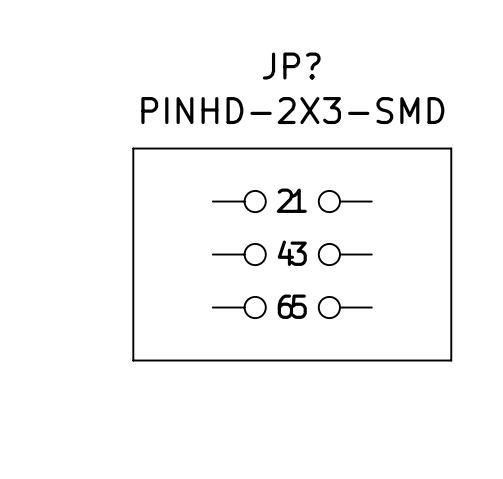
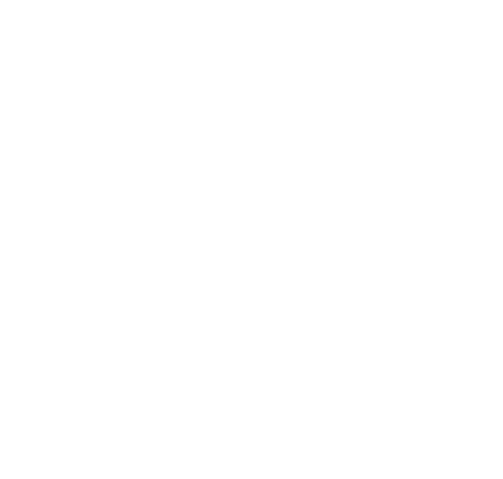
JP?: PINHD-2X3-SMD (292, 254) -> none

